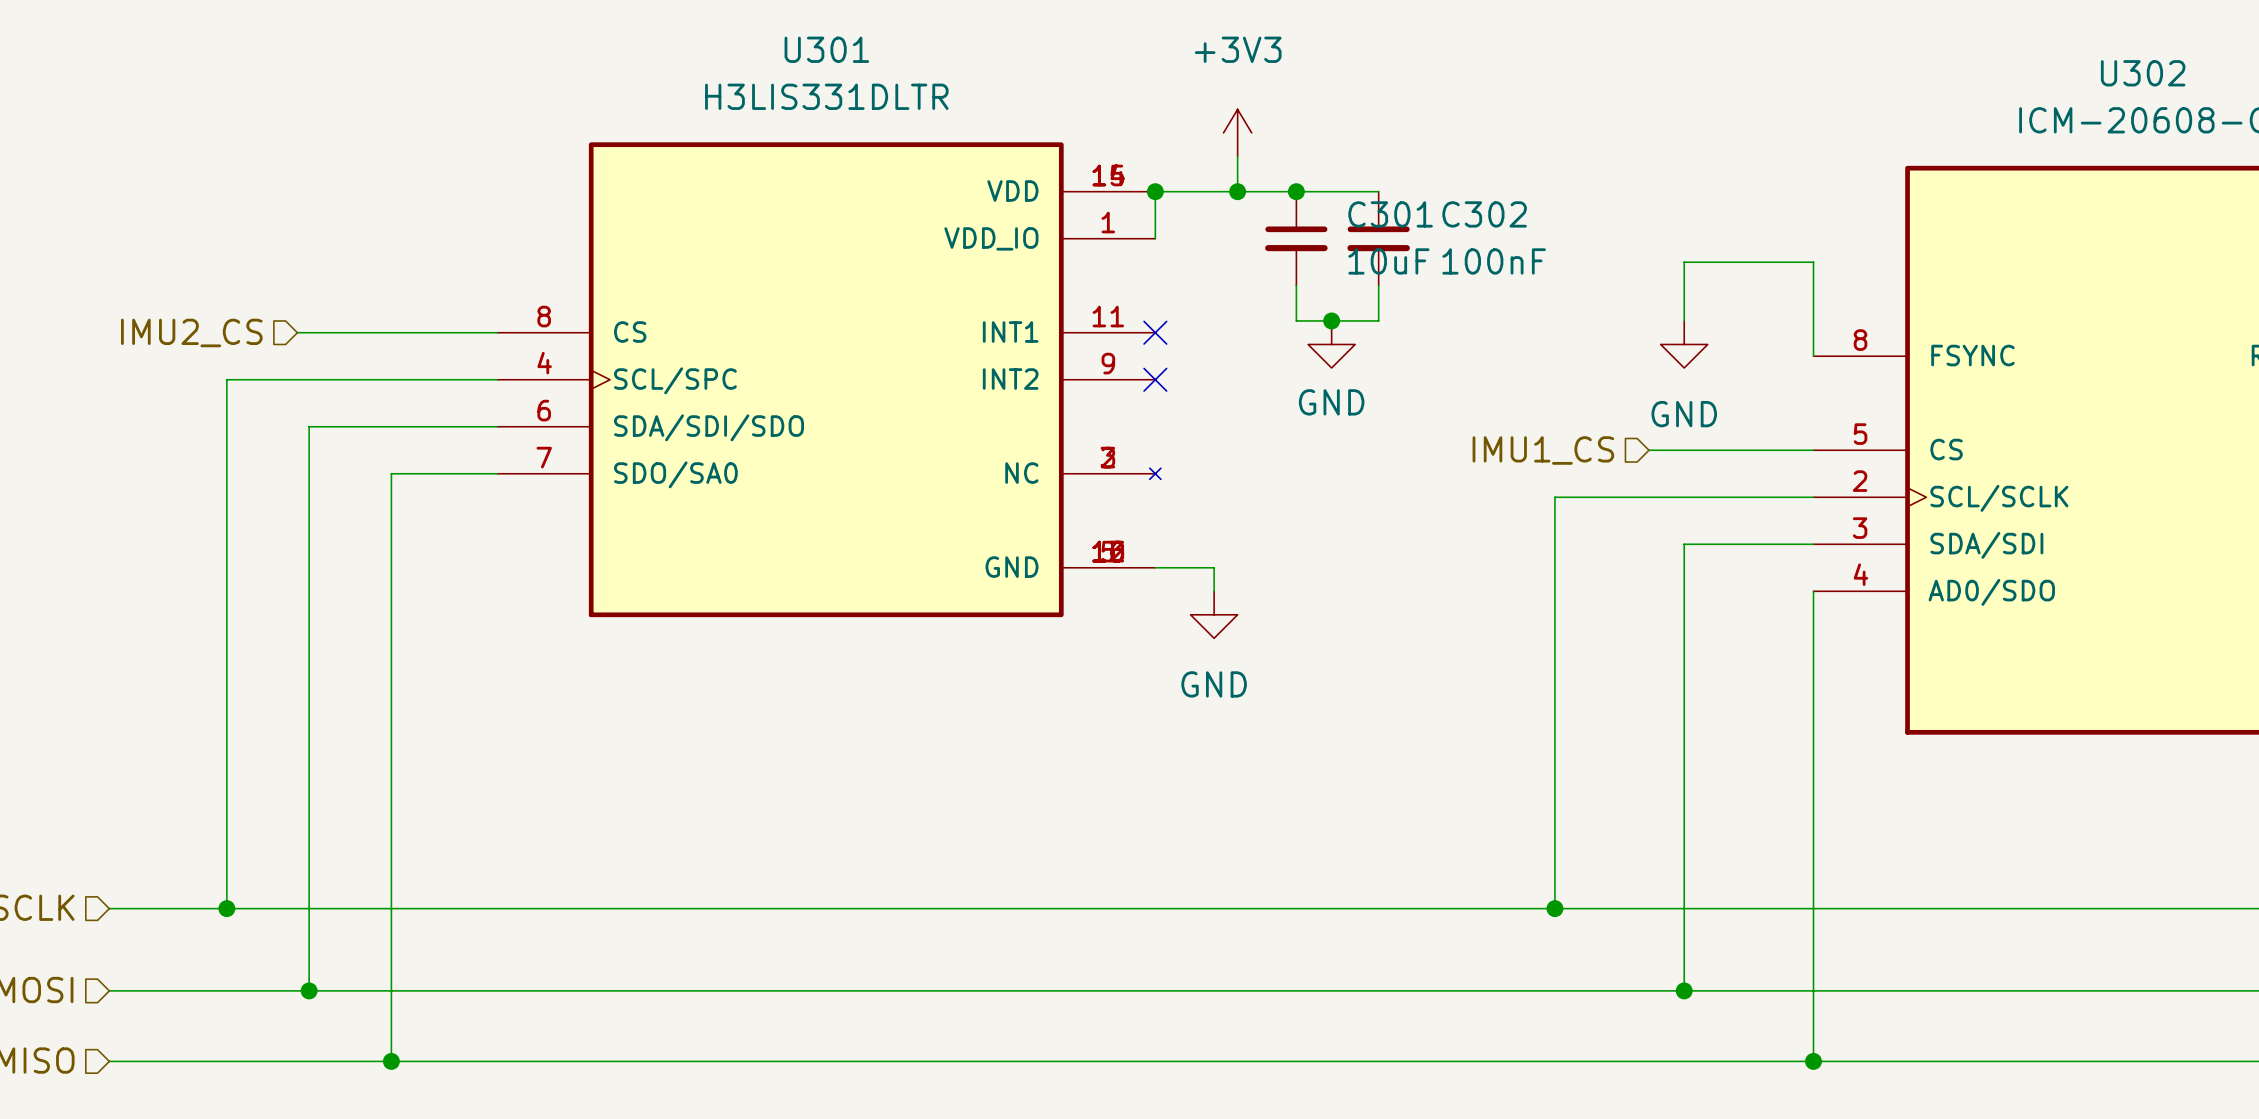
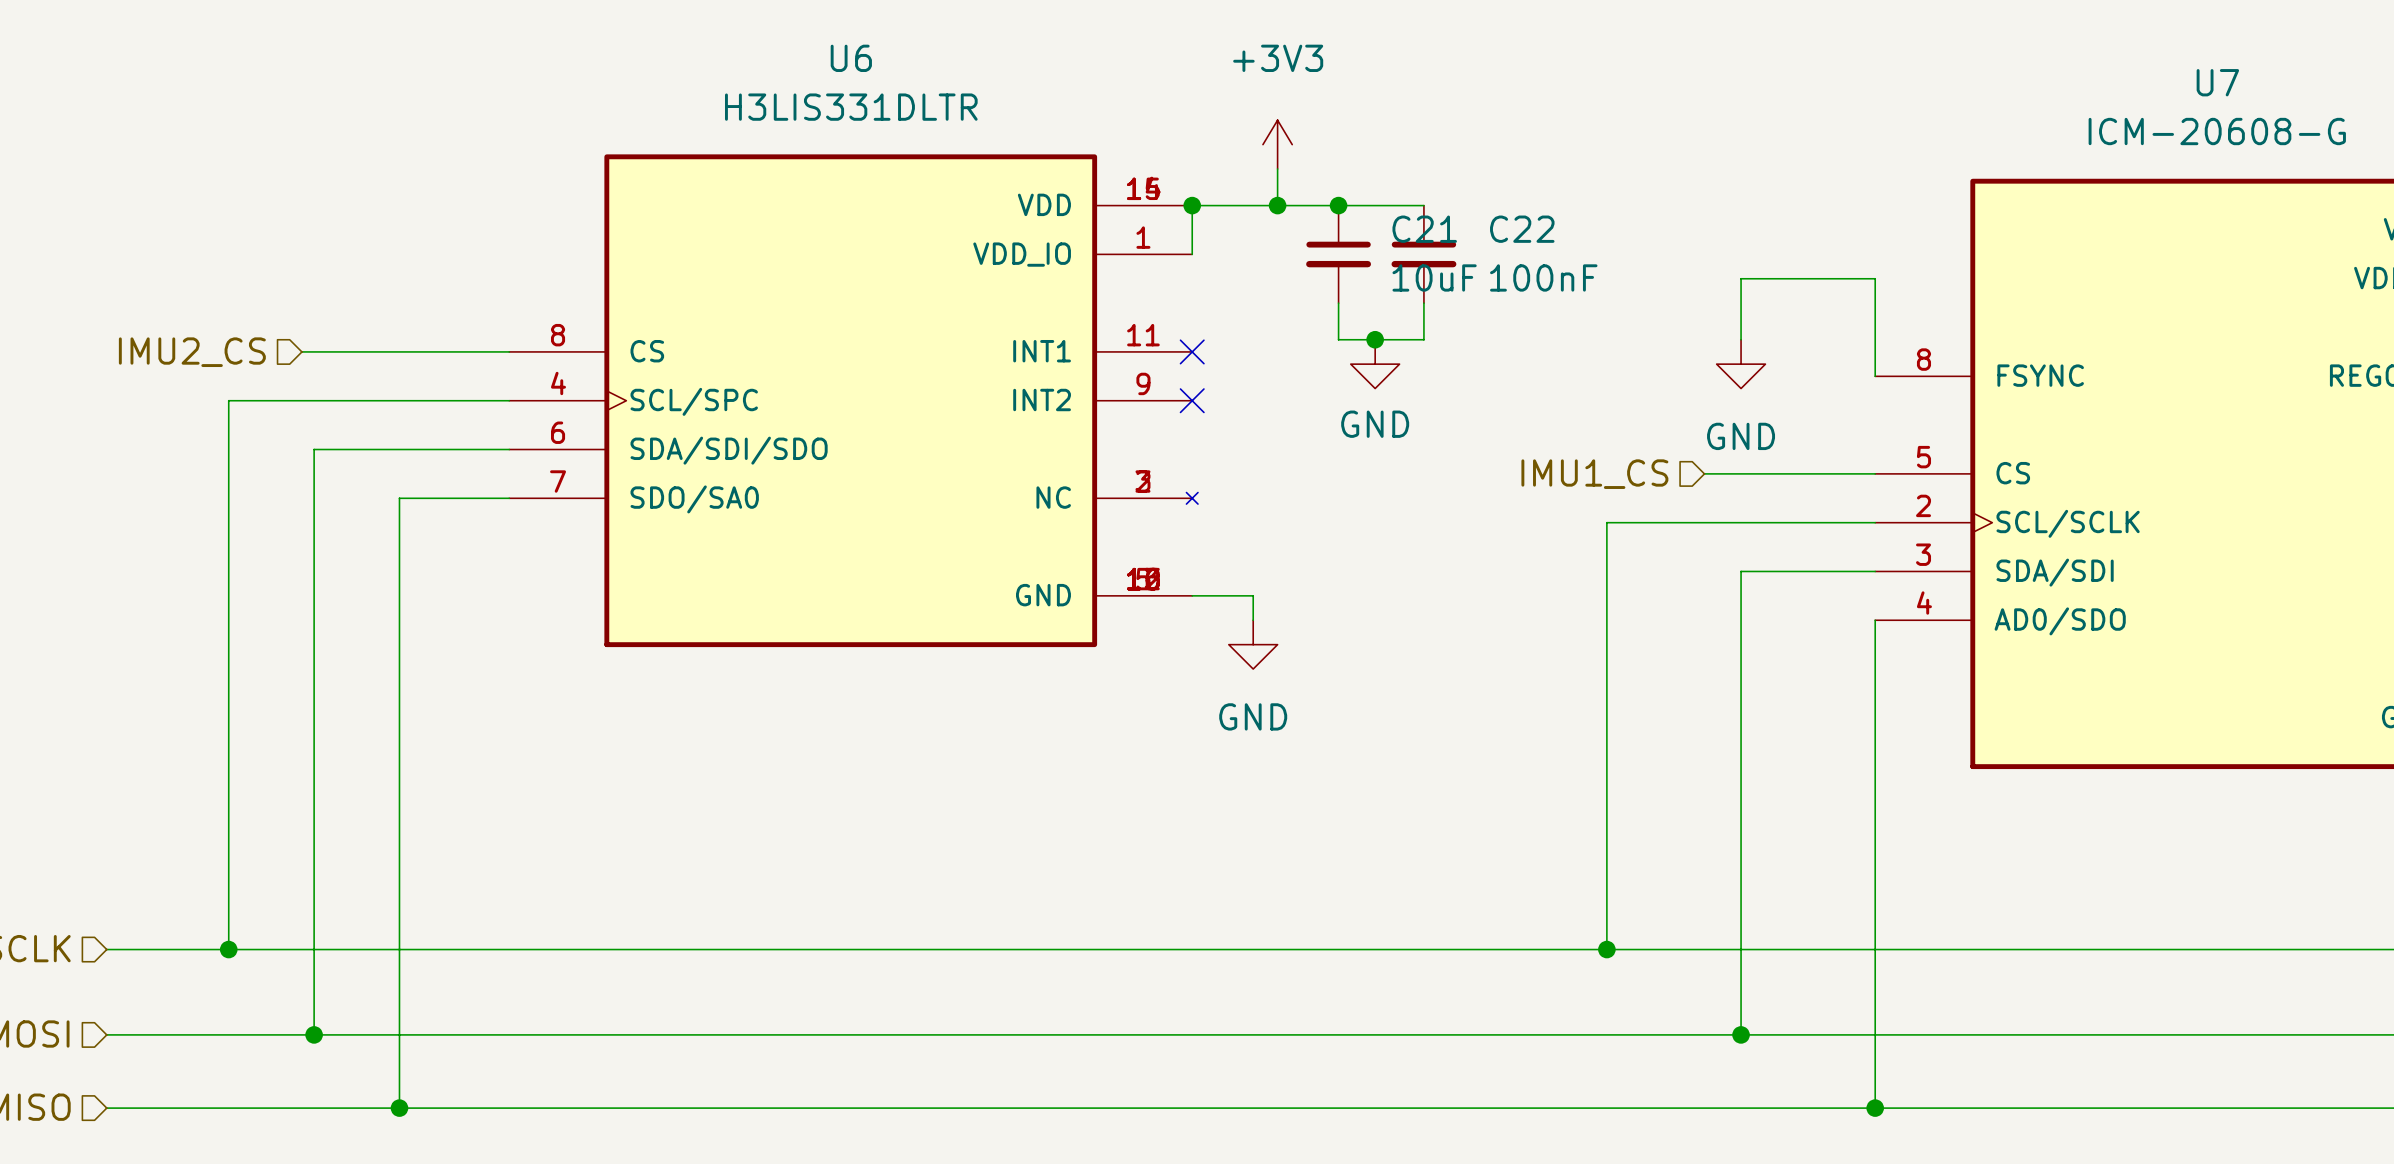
U301 name: U301 (826, 49) -> U6 (851, 58)
U302 name: U302 (2143, 73) -> U7 (2217, 82)
C301 name: C301 (1390, 214) -> C21 (1424, 229)
C302 name: C302 (1484, 214) -> C22 (1522, 229)

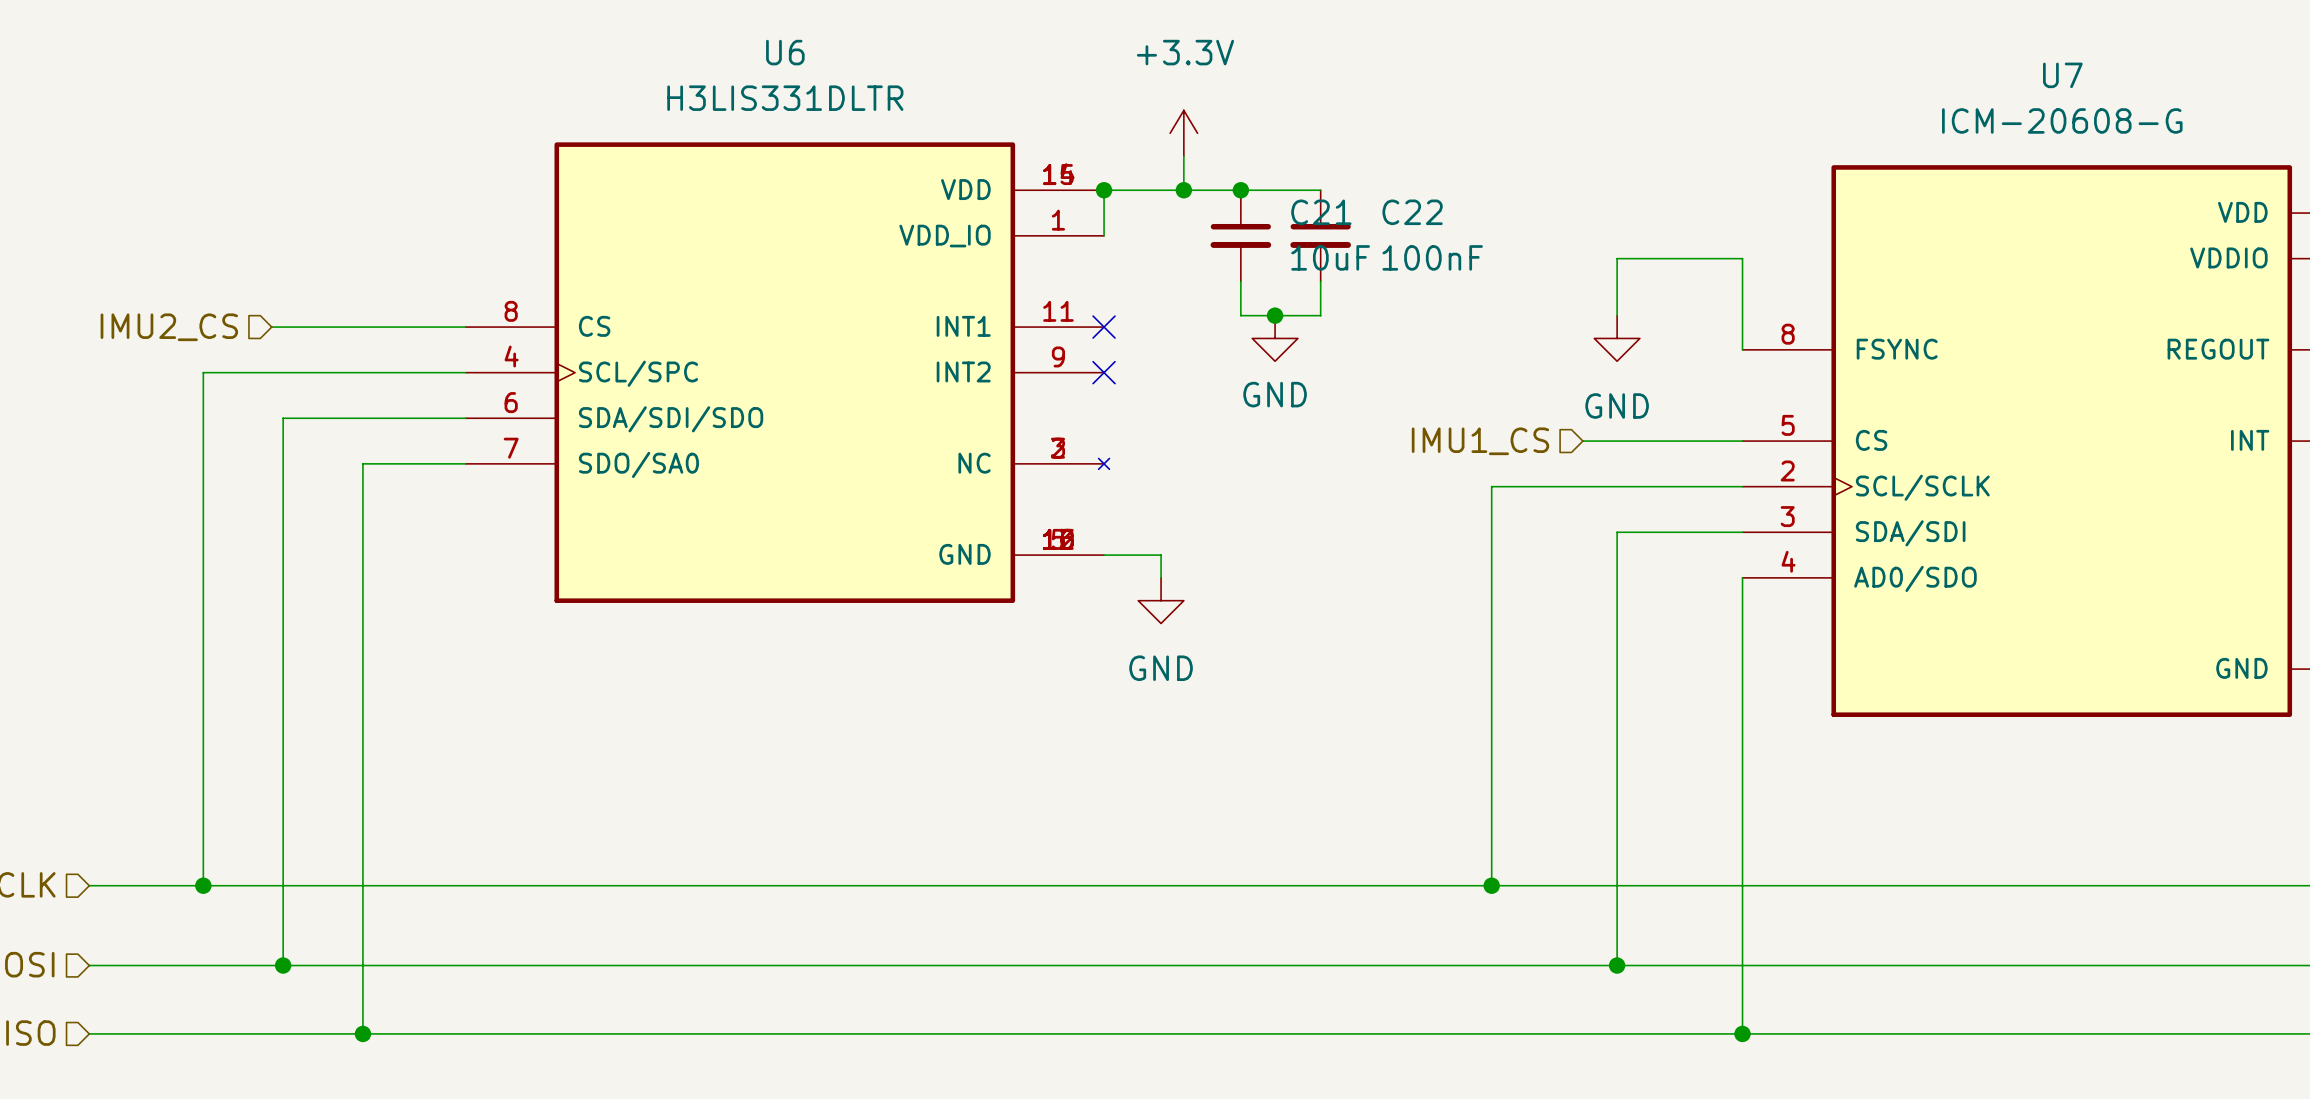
power symbol: +3V3 (1277, 144) -> +3.3V (1183, 133)

